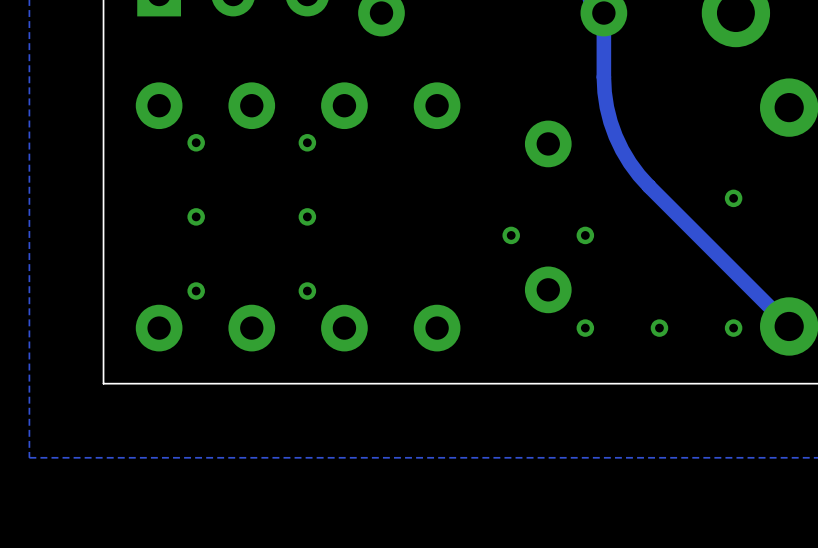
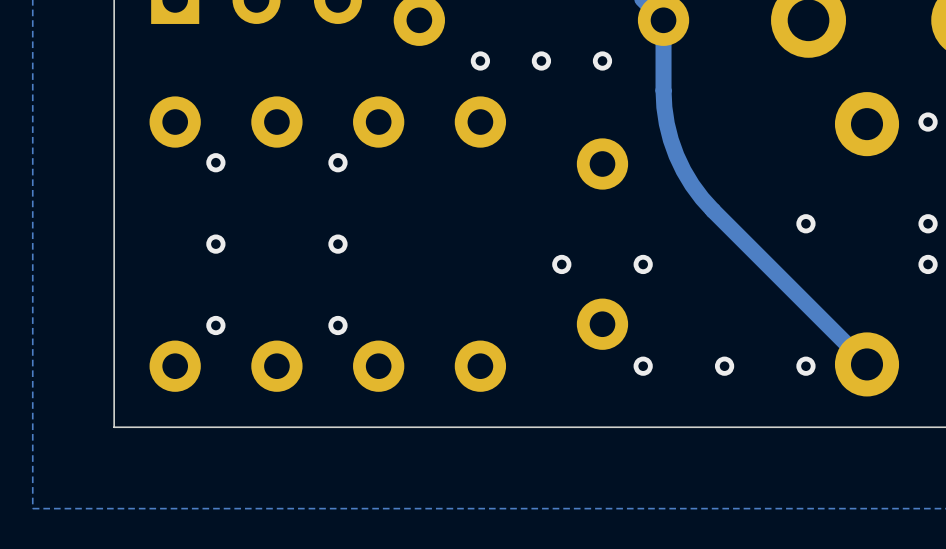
via: none -> (480, 60)
via: none -> (541, 60)
via: none -> (602, 60)

